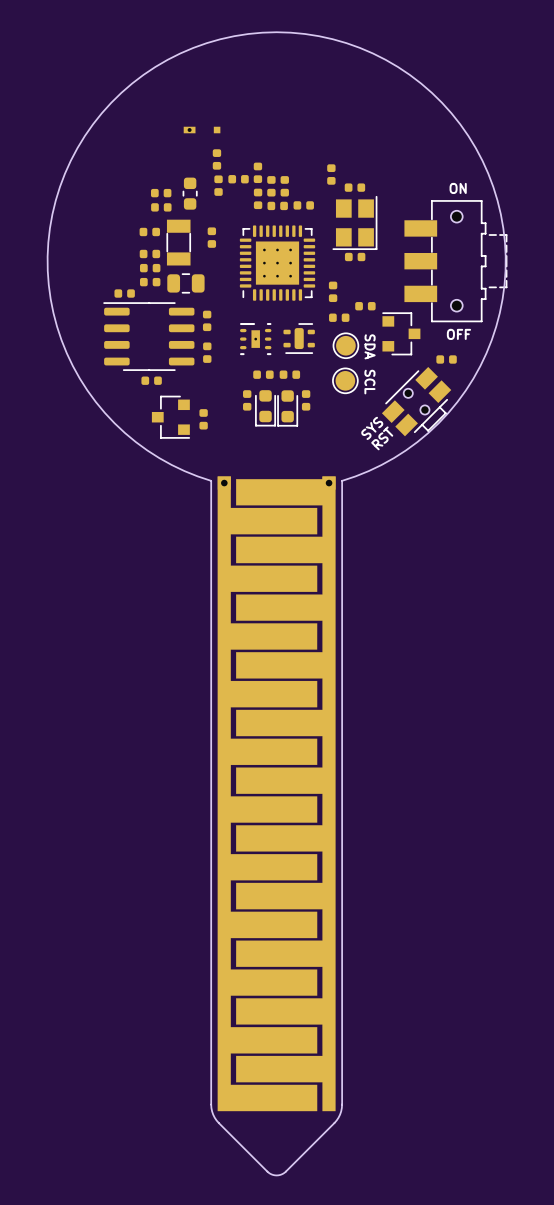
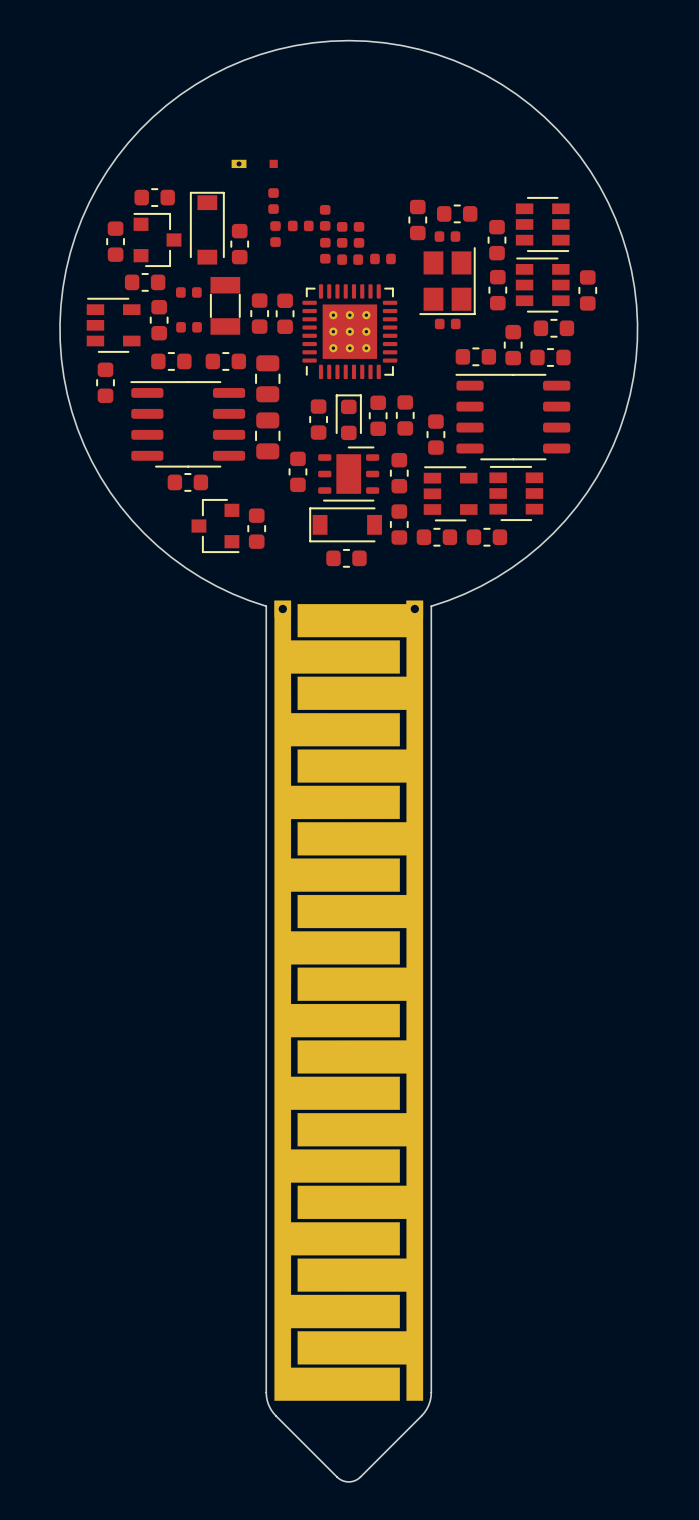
part: none -> (154, 197)
part footprint: [327, 164, 336, 185] -> [408, 199, 428, 241]
part: none -> (457, 213)
part: none -> (542, 224)
part footprint: [150, 188, 172, 198] -> [189, 191, 225, 265]
text: ON (458, 188) -> none
part: none -> (157, 239)
part: none -> (497, 240)
part: none -> (115, 241)
part: (161, 207) -> none
part: none -> (145, 282)
part: none -> (542, 285)
part: none -> (497, 290)
part: none -> (587, 290)
part: (211, 237) -> none
part: none -> (259, 313)
part: none -> (285, 313)
part: none -> (159, 320)
part: (149, 253) -> none
part: none -> (113, 325)
part: none -> (189, 327)
part: none -> (553, 328)
part: (455, 261) -> none
part: (150, 268) -> none
part footprint: [167, 273, 205, 294] -> [205, 352, 247, 371]
part: none -> (513, 345)
part: (150, 282) -> none
part: none -> (475, 356)
part: none -> (550, 357)
part: none -> (171, 361)
part: (333, 291) -> none
part: (124, 293) -> none
part: none -> (267, 378)
part: none -> (105, 382)
part: (365, 306) -> none
part footprint: [382, 312, 421, 356] -> [455, 373, 571, 461]
part: (339, 317) -> none
part: (207, 320) -> none
part footprint: [239, 323, 272, 356] -> [309, 399, 328, 440]
part footprint: [283, 323, 315, 354] -> [368, 395, 388, 436]
part: none -> (405, 415)
part: none -> (348, 417)
part footprint: [332, 332, 360, 359] -> [426, 414, 446, 455]
text: OFF (458, 334) -> none
part footprint: [203, 342, 212, 363] -> [255, 412, 281, 460]
text: SDA (370, 346) -> none
part: (446, 359) -> none
part footprint: [381, 366, 452, 437] -> [489, 465, 544, 522]
part: none -> (297, 471)
part: (263, 374) -> none
part: (289, 374) -> none
part: none -> (348, 474)
part: none -> (399, 473)
part footprint: [141, 376, 162, 385] -> [167, 473, 209, 492]
part: (345, 380) -> none
text: SCL (369, 382) -> none
part: none -> (450, 493)
part: (247, 400) -> none
part: (306, 400) -> none
part: (265, 408) -> none
part: (287, 408) -> none
part footprint: [199, 409, 208, 430] -> [247, 508, 267, 549]
part: none -> (345, 524)
part: none -> (399, 524)
part: none -> (436, 537)
part: none -> (486, 537)
text: SYS (372, 428) -> none
text: RST (382, 438) -> none
part: none -> (346, 558)

